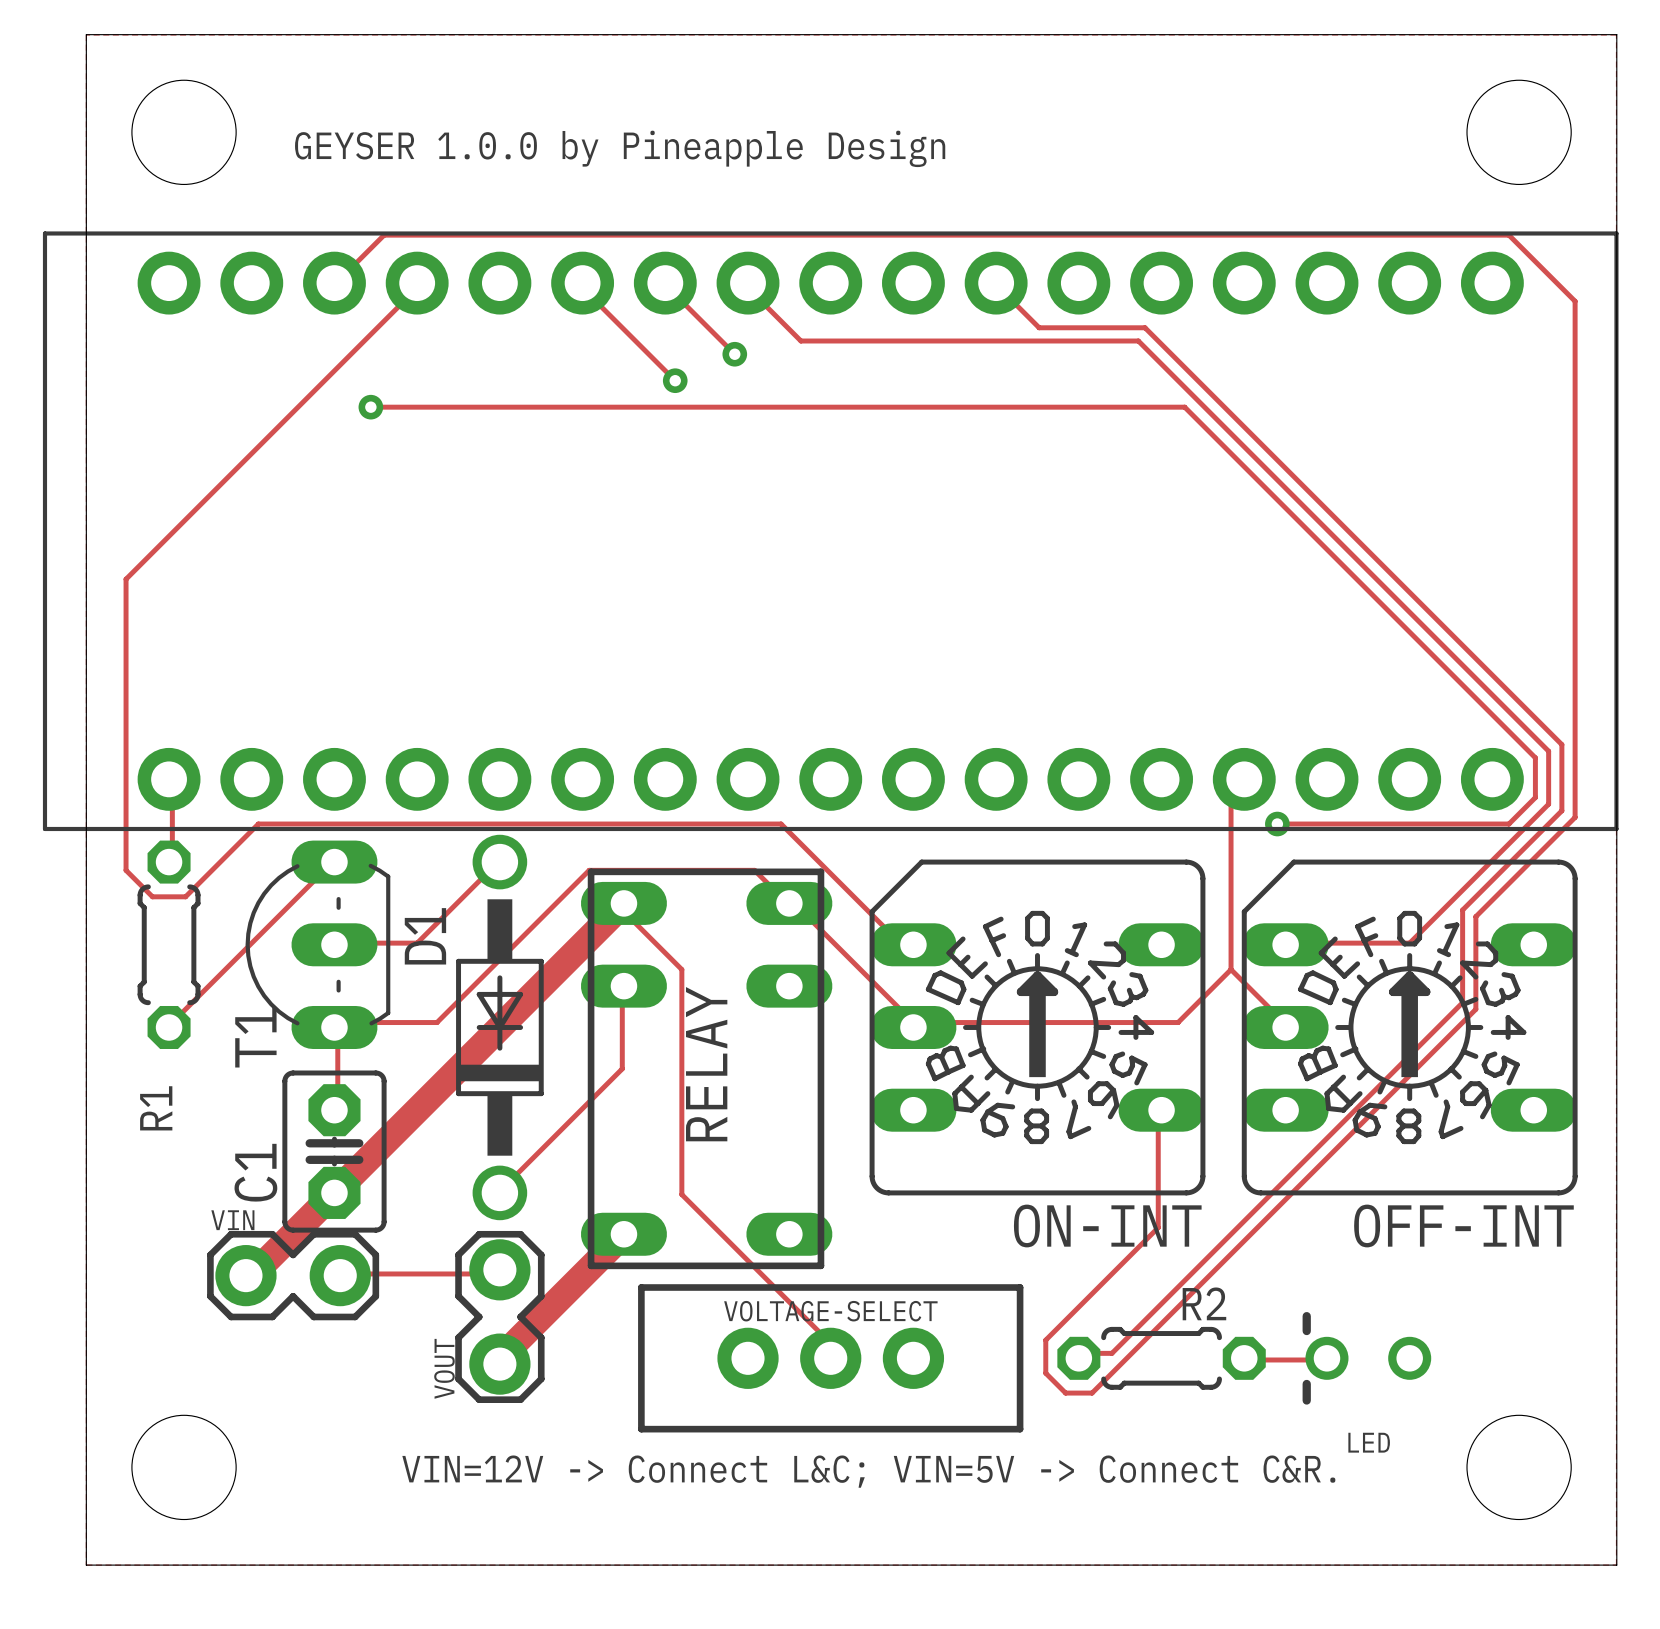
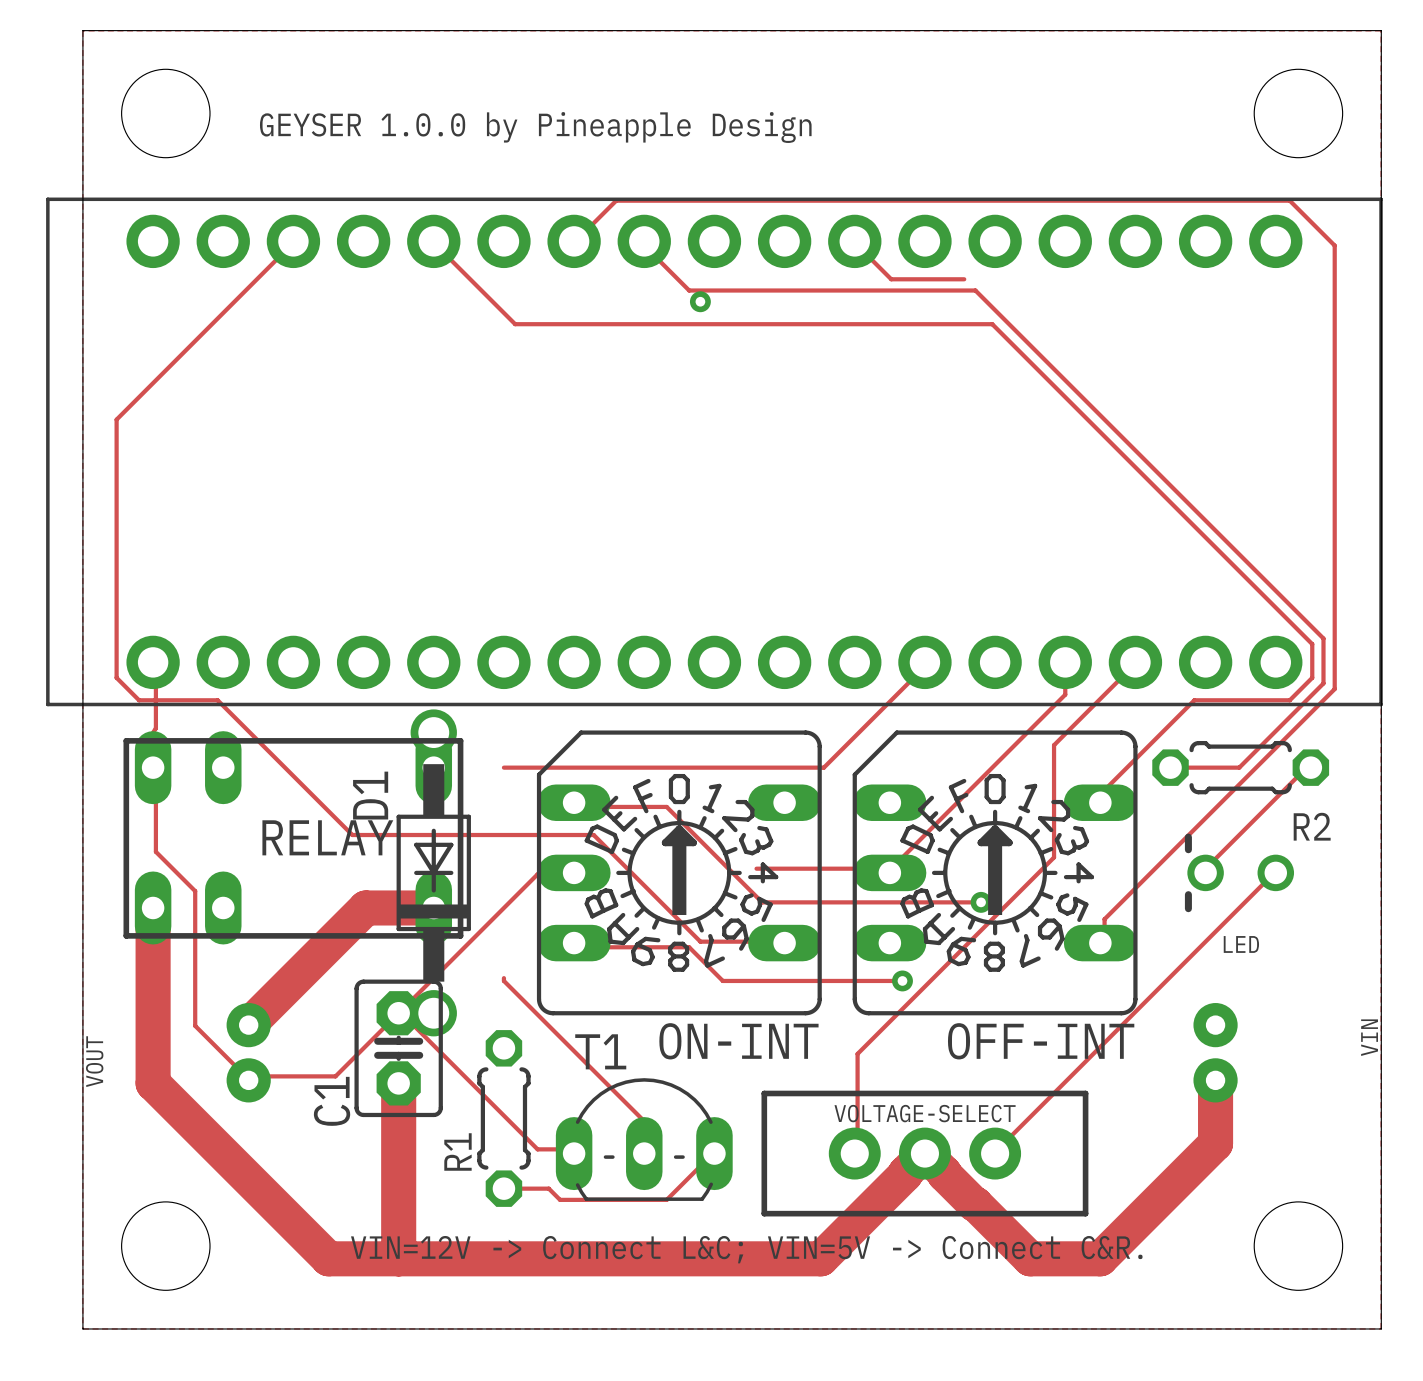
track: (714, 235) (384, 235) (334, 283) -> none
track: (417, 283) (417, 288) (126, 579) -> (293, 241) (116, 419) (116, 492)
track: (582, 283) (582, 288) (675, 380) -> none
track: (665, 283) (734, 354) -> (574, 241) (616, 200)
track: (1561, 288) (1575, 301) (1575, 817) (1475, 916) (1475, 1009) (1092, 1393) (1065, 1393) (1045, 1373) (1045, 1340) (1158, 1227) (1158, 1115) (1161, 1110) -> none
track: (1125, 327) (1145, 327) (1561, 744) -> (1334, 245) (1334, 632)
via: (734, 354) -> none
via: none -> (700, 301)
via: (675, 380) -> none
track: (370, 407) (1184, 407) -> (433, 241) (515, 324) (992, 324) (1014, 346)
via: (370, 407) -> none
track: (1244, 784) (1231, 797) (1231, 876) -> (1135, 662) (1054, 745)
track: (126, 797) (126, 870) (152, 896) (185, 896) (258, 824) (781, 824) (900, 943) (913, 943) (913, 944) -> (116, 677) (139, 700) (217, 700) (352, 835) (593, 835) (700, 941) (784, 943)
track: (1277, 824) (1396, 824) -> (1104, 801) (1104, 790) (1194, 700)
via: (1277, 824) -> none
track: (334, 862) (169, 1027) -> none
track: (499, 862) (417, 943) (337, 943) (334, 944) -> none
track: none -> (153, 767) (155, 767) (155, 851) (195, 891) (195, 1025) (248, 1080) (251, 1076) (335, 1076) (537, 874) (574, 872)
track: (787, 903) (754, 870) (589, 870) (437, 1022) (337, 1022) (334, 1027) (337, 1029) (337, 1108) (334, 1110) -> (677, 767) (503, 767)
track: (794, 903) (913, 1022) (913, 1027) -> (683, 767) (823, 767) (924, 666) (924, 662)
track: (1449, 903) (1409, 943) (1290, 943) -> (1239, 767) (1170, 767)
track: none -> (1310, 767) (1306, 767) (1205, 868) (1205, 872)
track: (1462, 910) (1462, 1002) (1111, 1353) (1078, 1353) (1078, 1358) -> (1250, 773) (1104, 919) (1104, 941) (1100, 943)
R1 position: (169, 944) -> (503, 1118)
T1 rotation: 0° (317, 944) -> 90° clockwise (644, 1139)
T1 position: (317, 944) -> (644, 1139)
track: none -> (574, 802) (576, 806) (666, 806) (762, 902) (981, 902)
track: none -> (1054, 823) (1054, 857) (857, 1053) (857, 1149) (854, 1153)
track: (623, 986) (622, 989) (622, 1068) (499, 1192) -> none
track: none -> (756, 868) (784, 868)
track: (1032, 1022) (1178, 1022) (1231, 969) (1283, 1022) (1285, 1027) -> (885, 868) (889, 872) (891, 868) (1065, 694) (1065, 666)
ON-INT position: (1037, 1027) -> (679, 872)
OFF-INT position: (1409, 1027) -> (995, 872)
track: none -> (1275, 872) (995, 1153)
via: none -> (981, 902)
track: none -> (153, 907) (153, 1083) (328, 1258) (820, 1258) (924, 1153) (1030, 1258) (1100, 1258) (1215, 1143) (1215, 1080)
track: none -> (433, 907) (365, 907) (248, 1025)
RELAY rotation: 0° (706, 1068) -> 90° counterclockwise (293, 837)
RELAY position: (706, 1068) -> (293, 837)
R1 name position: R1 (156, 1108) -> R1 (457, 1151)
track: none -> (574, 943) (576, 947) (689, 947) (722, 980) (902, 980)
C1 position: (334, 1151) -> (398, 1048)
track: none -> (503, 978) (503, 980) (644, 1121) (644, 1153)
via: none -> (902, 980)
C1 name position: C1 (255, 1172) -> C1 (332, 1101)
track: none -> (398, 1013) (402, 1014) (537, 1149) (571, 1149) (574, 1153)
track: (623, 1234) (499, 1358) (499, 1364) -> none
VOUT: none -> (248, 1052)
VIN: none -> (1215, 1052)
track: (499, 1269) (496, 1273) (344, 1273) (340, 1275) -> none
track: (245, 1275) (251, 1275) (623, 903) (628, 916) (681, 969) (681, 1194) (827, 1340) (827, 1353) (830, 1358) -> (503, 1188) (548, 1188) (560, 1199) (666, 1199) (714, 1153)
VIN: (293, 1275) -> none
track: none -> (398, 1083) (398, 1258)
R2 name position: R2 (1204, 1303) -> R2 (1312, 826)
VOUT: (499, 1316) -> none
VOLTAGE-SELECT position: (830, 1358) -> (924, 1153)
R2 position: (1161, 1358) -> (1240, 767)
track: (1244, 1358) (1244, 1359) (1323, 1359) (1326, 1358) -> none
LED position: (1366, 1358) -> (1239, 872)

